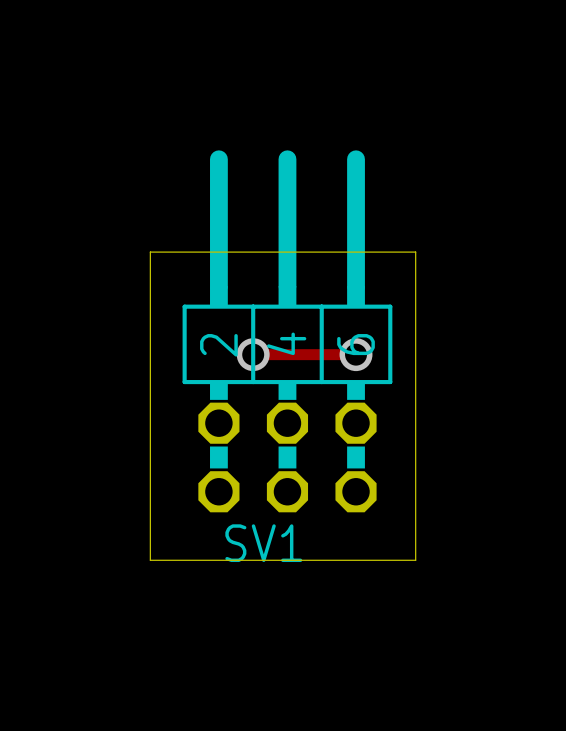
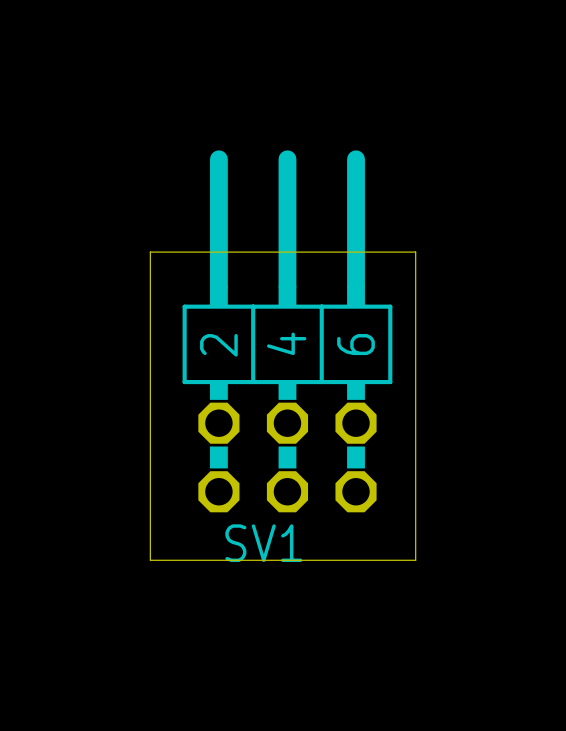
track: (253, 354) (356, 354) -> none
via: (253, 354) -> none
via: (356, 354) -> none

